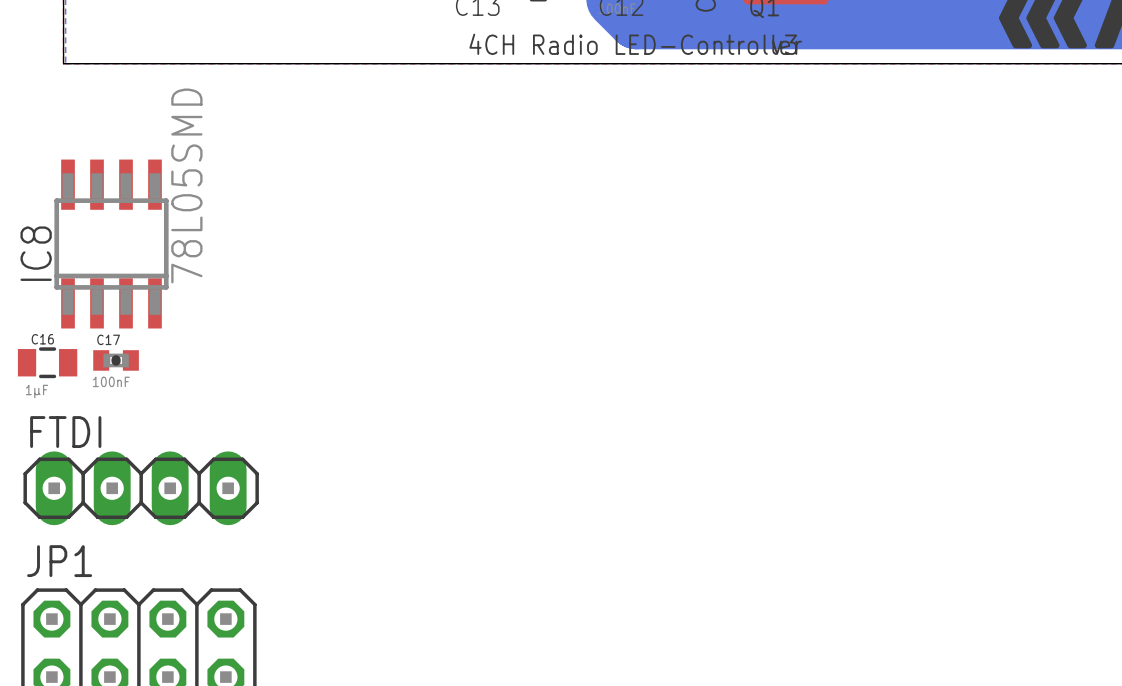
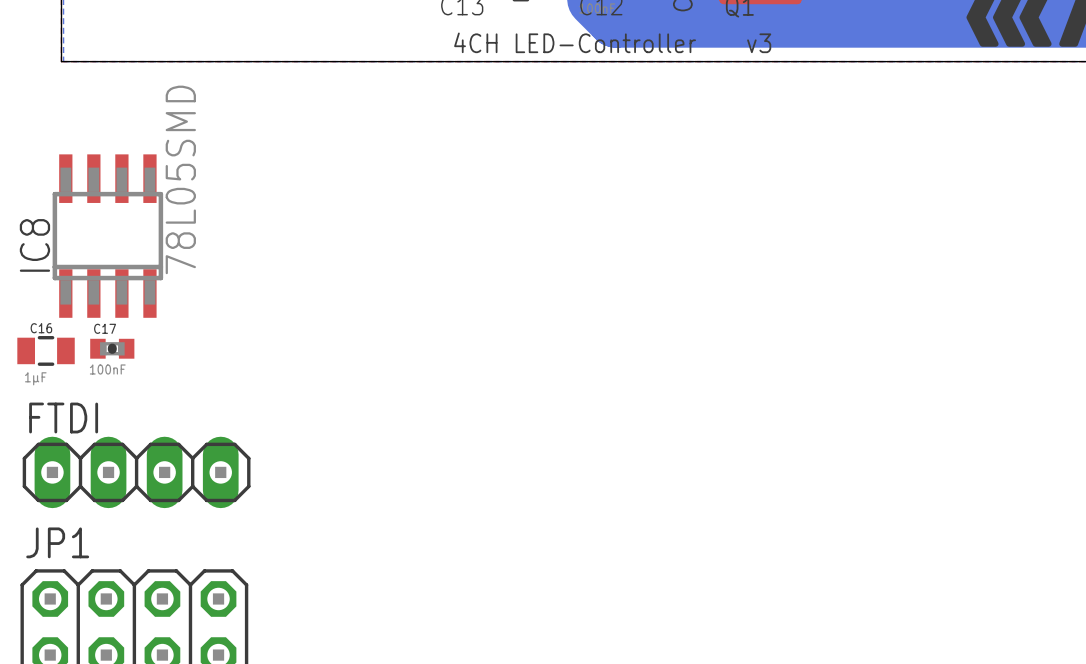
text: 4CH Radio LED-Controller (635, 44) -> 4CH LED-Controller (575, 42)

